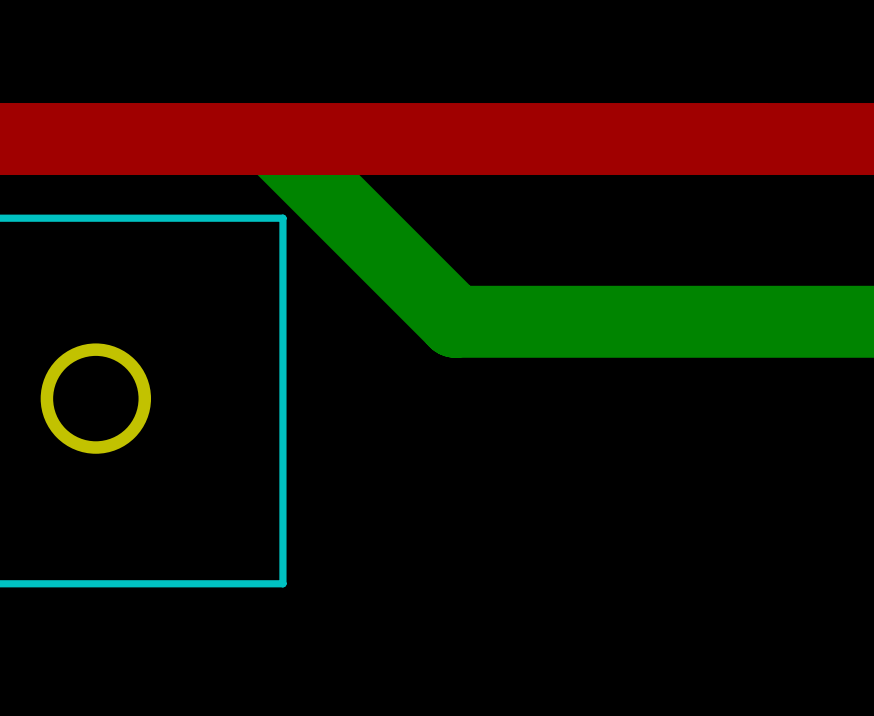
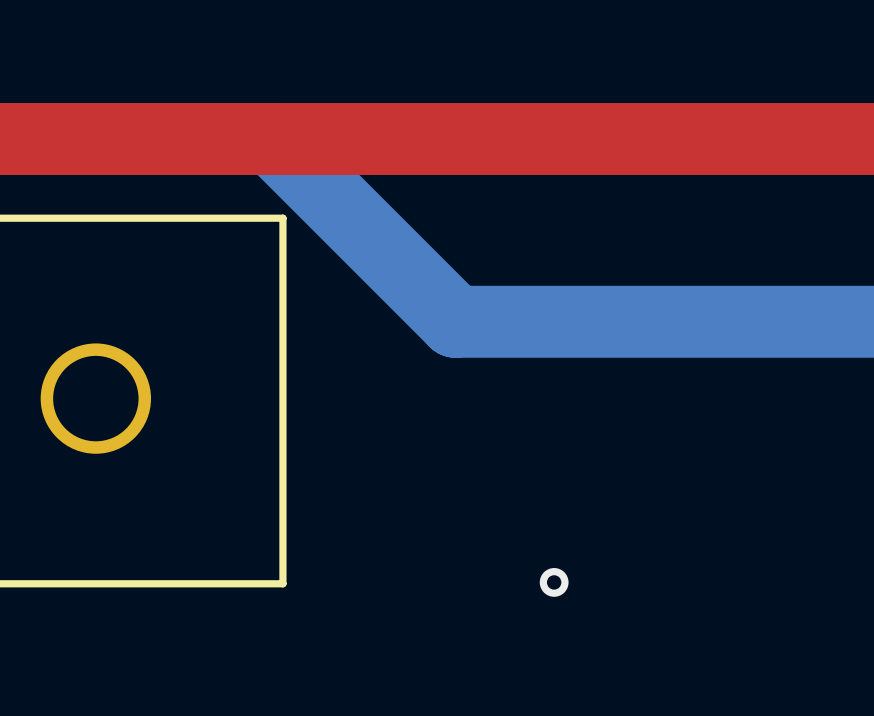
via: none -> (554, 582)

